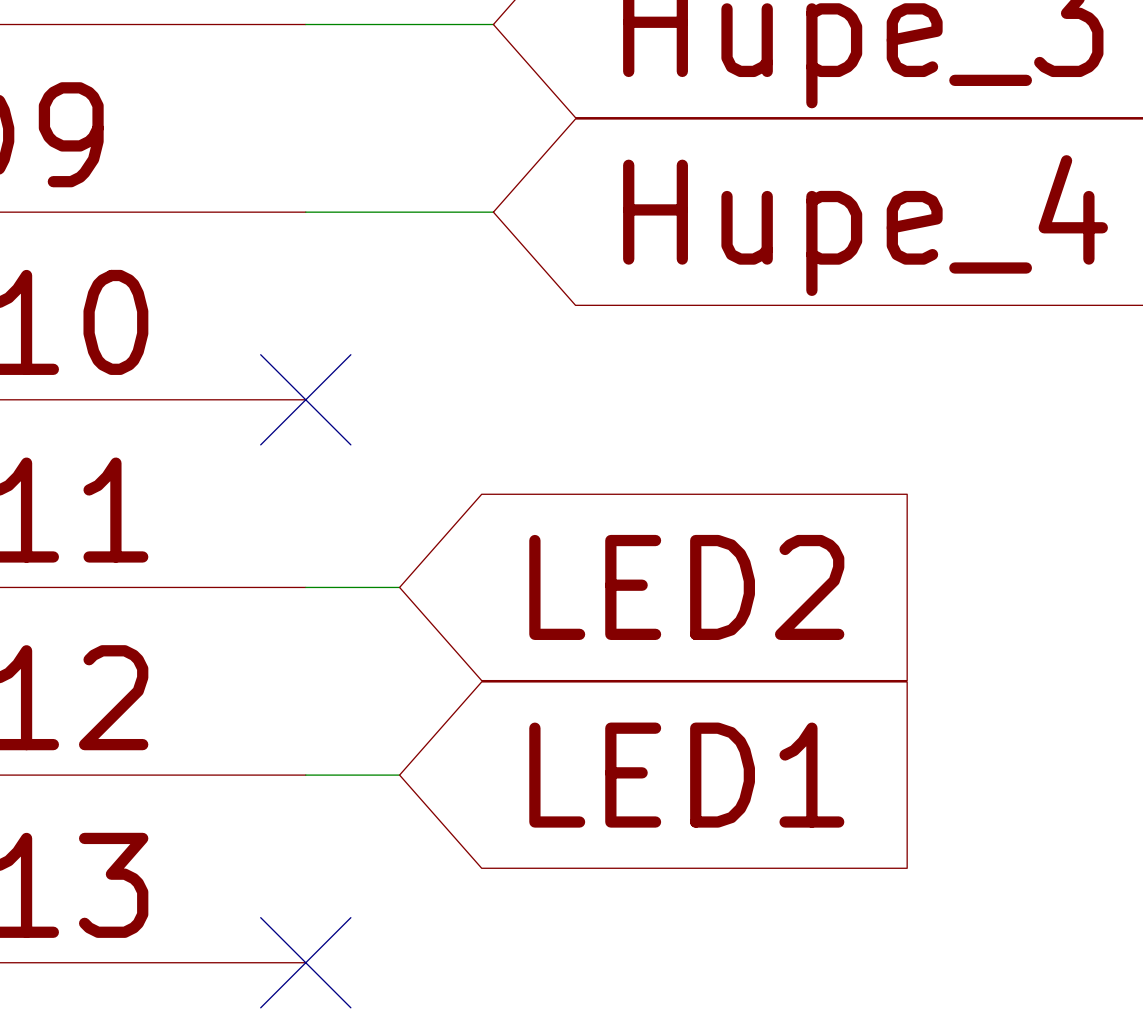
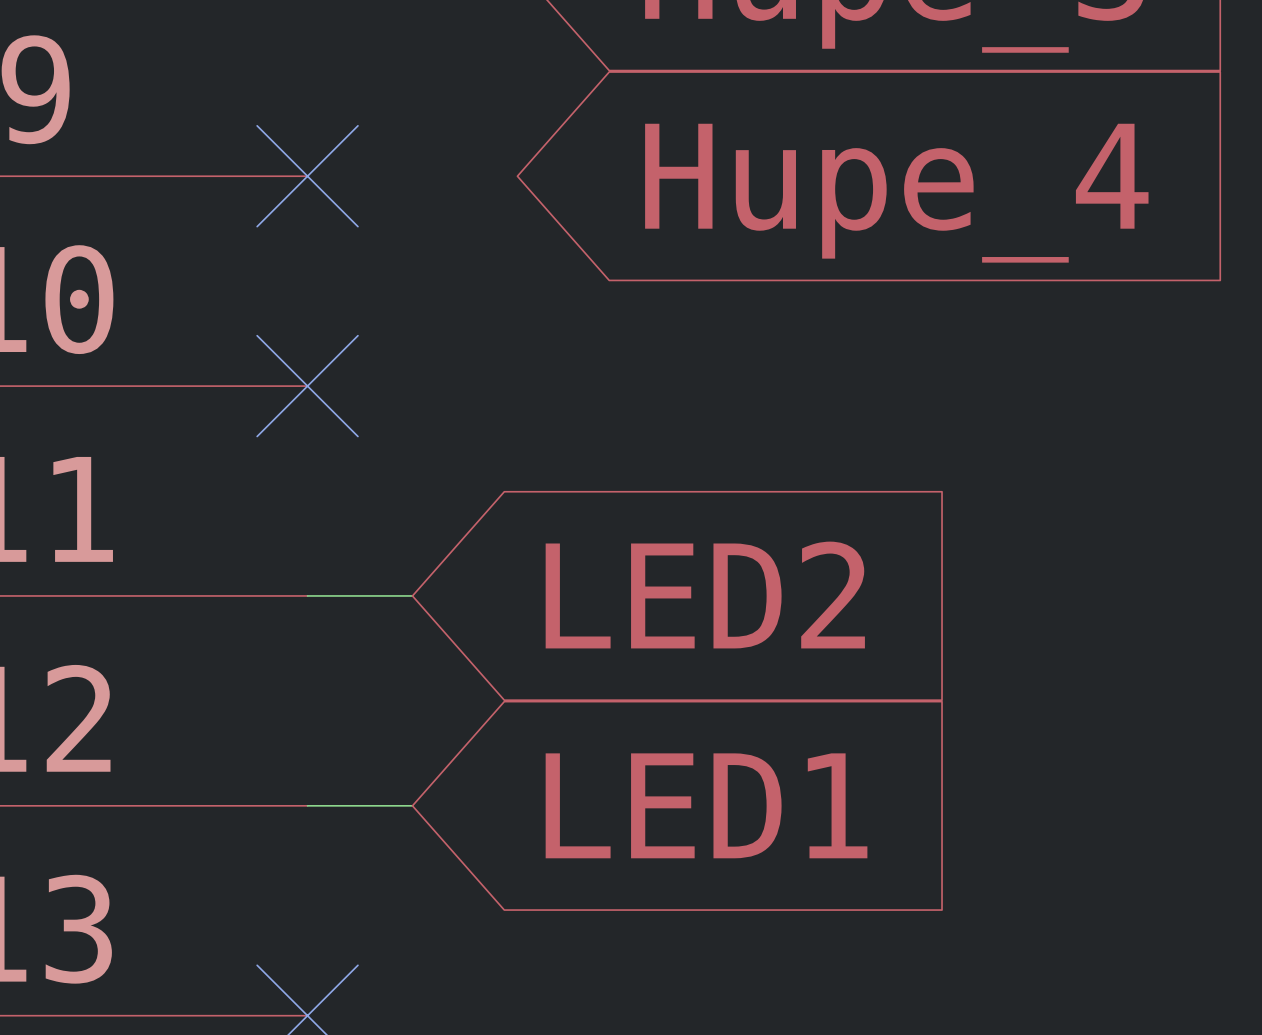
wire: (305, 212) (493, 212) -> none
no-connect mark: none -> (307, 176)

